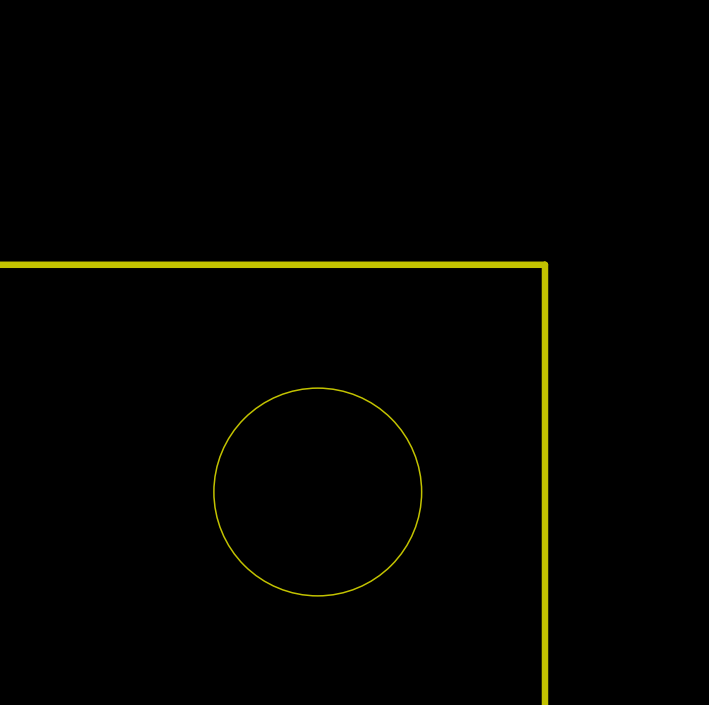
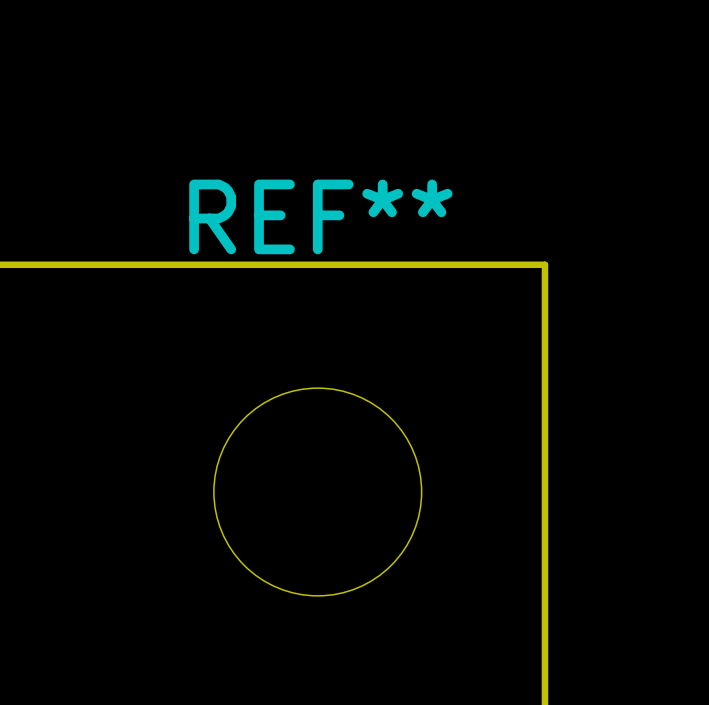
REF** name: none -> REF** (320, 216)

